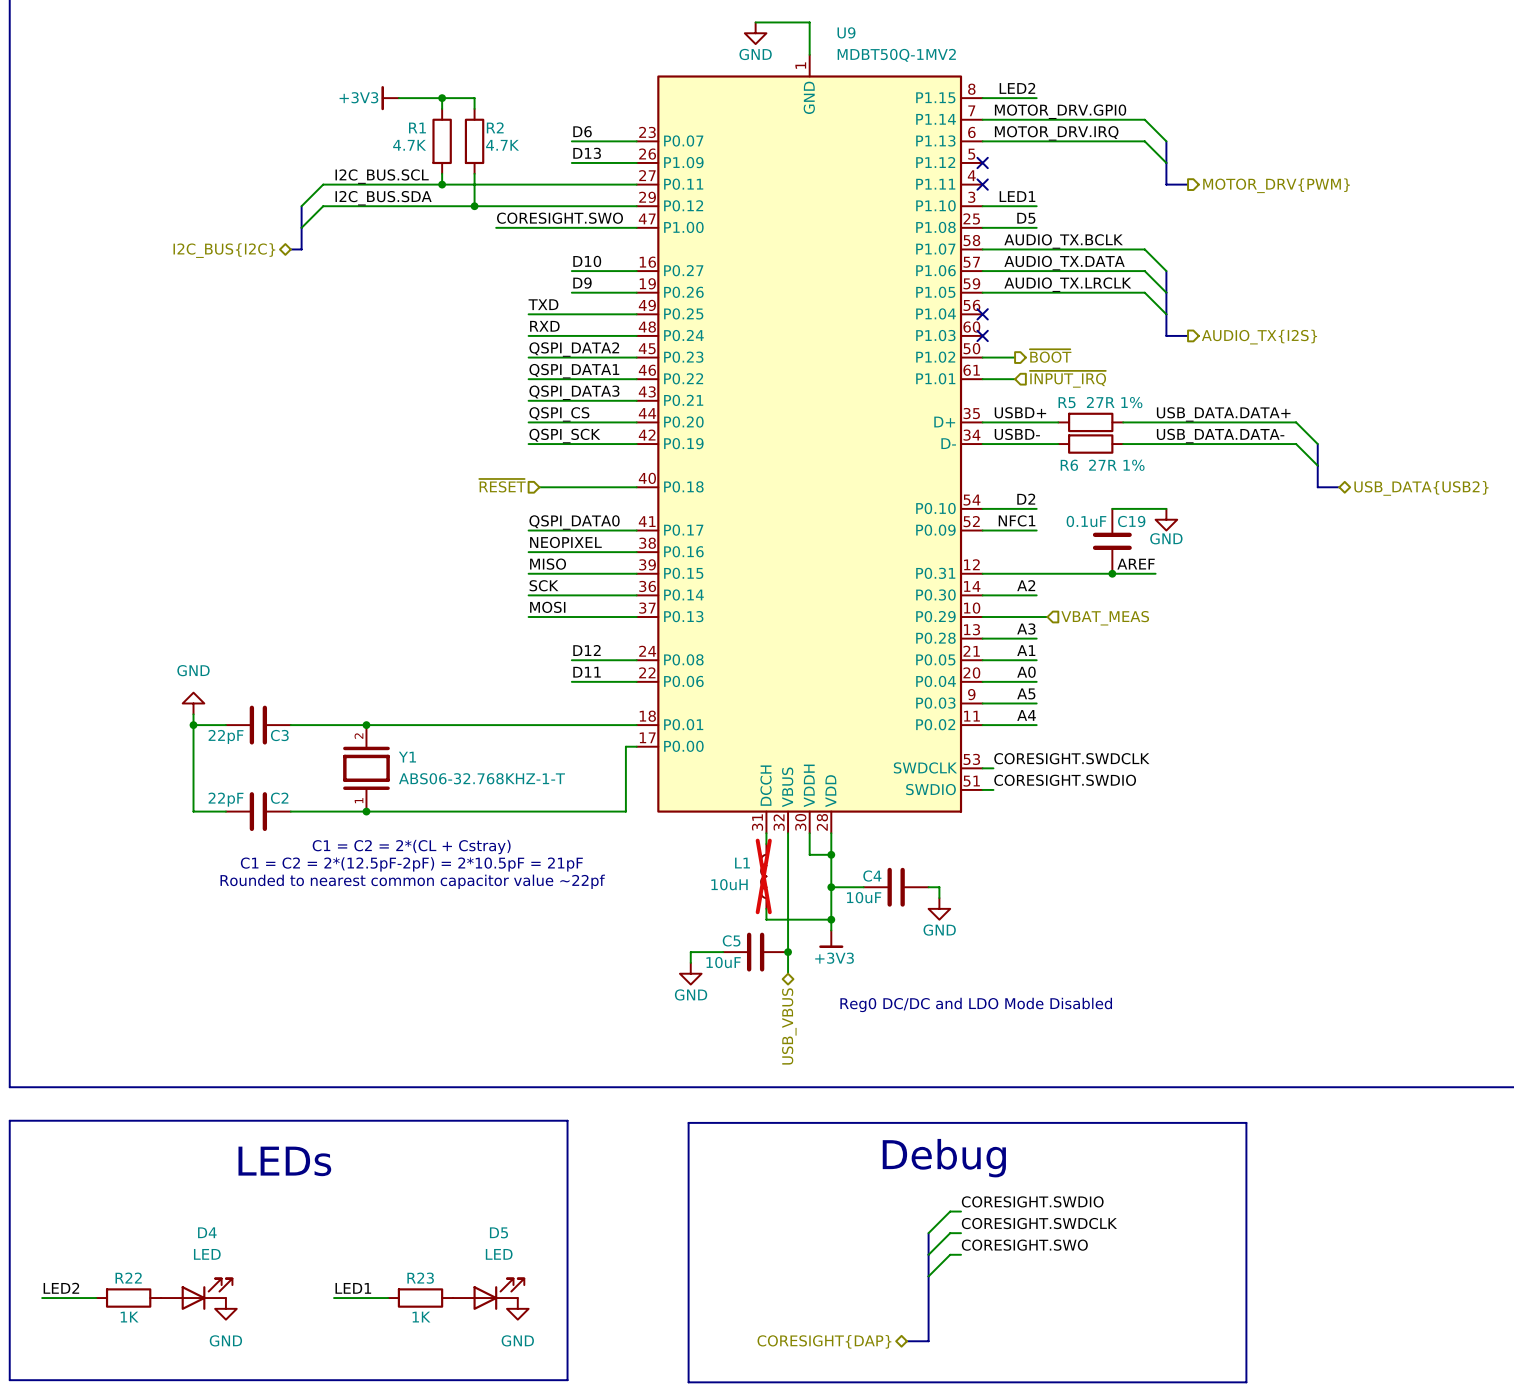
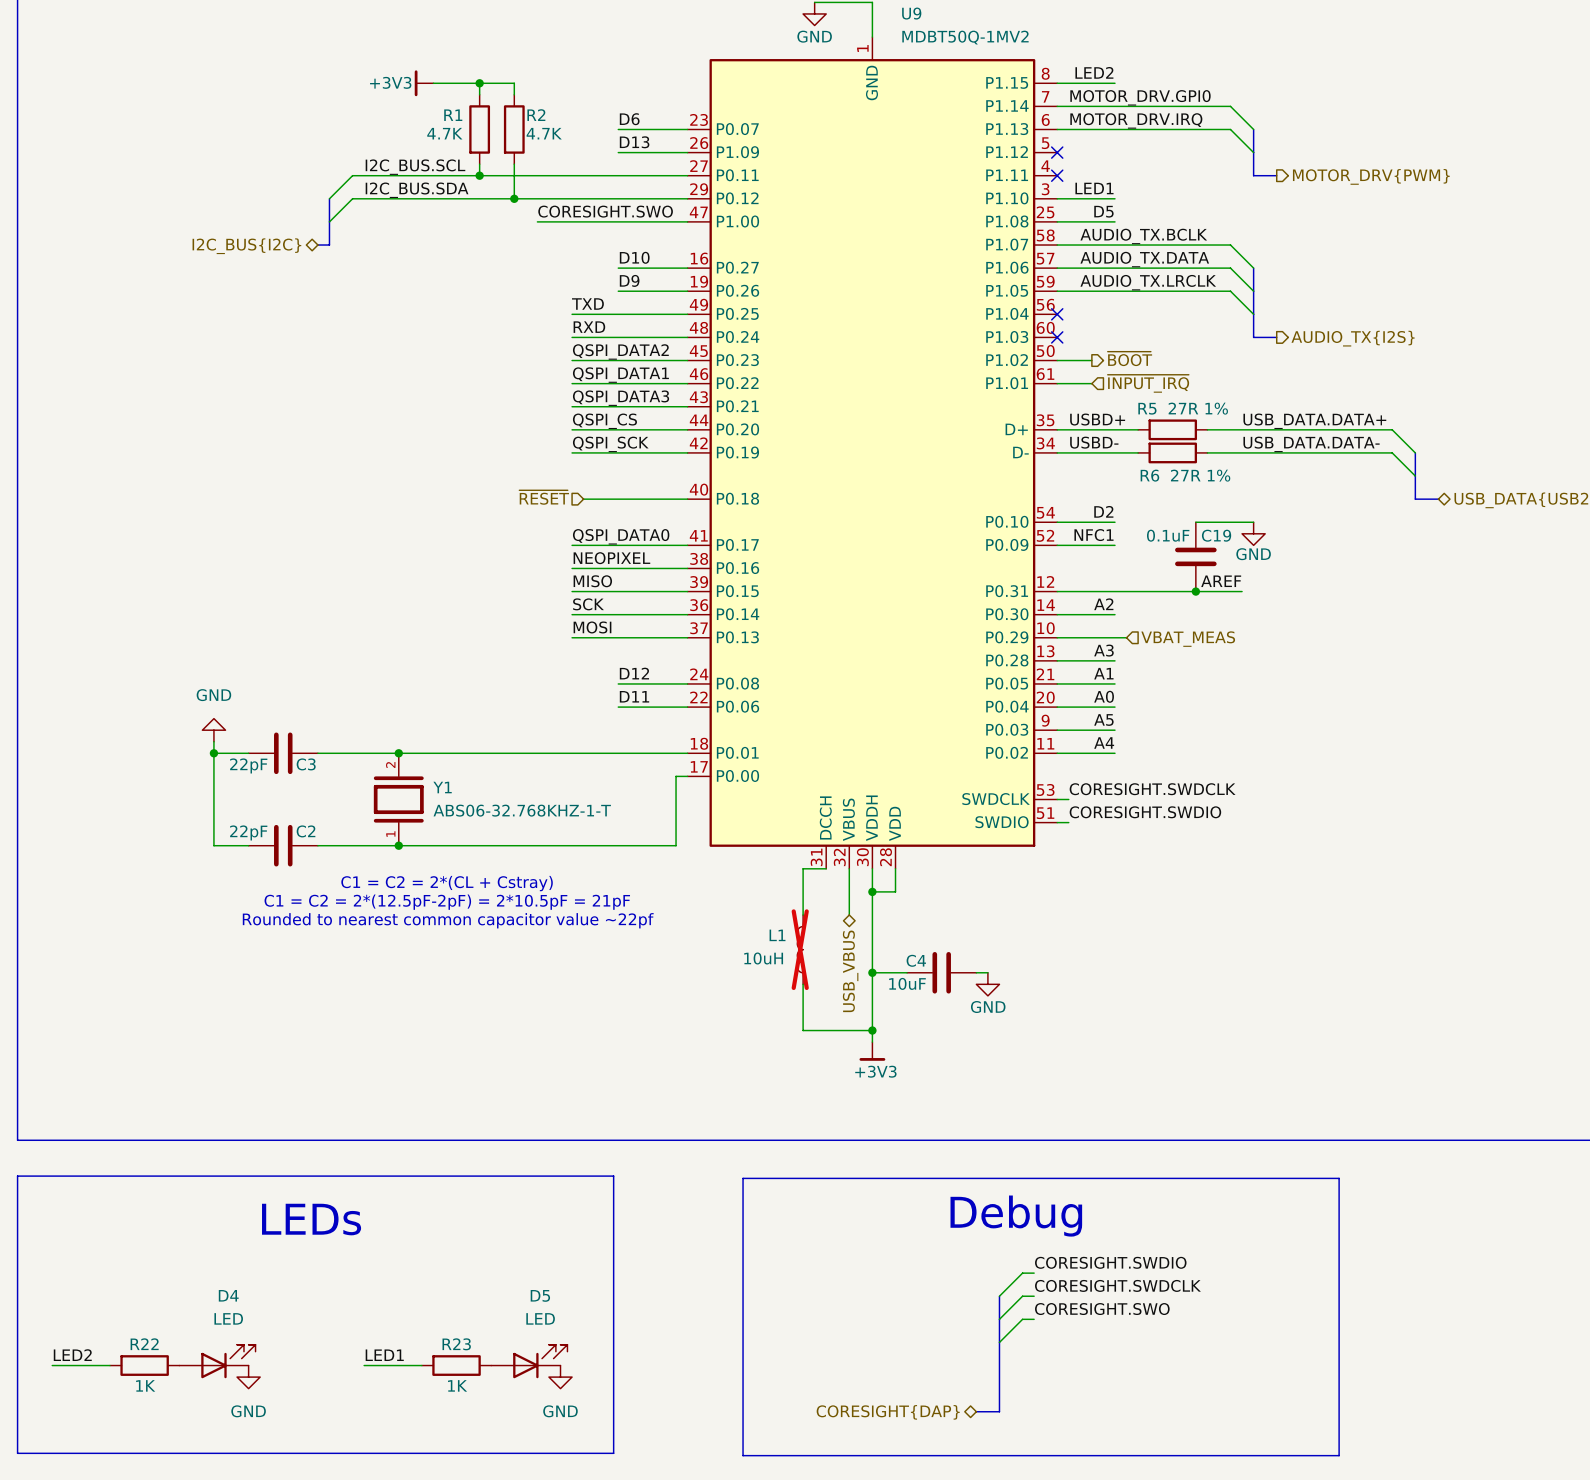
wire: (766, 833) (766, 844) -> (826, 868) (803, 868) (803, 915)
wire: none -> (872, 891) (872, 1042)
junction: none -> (872, 891)
wire: (831, 854) (831, 930) -> none
junction: (831, 854) -> none
L1 position: (763, 876) -> (800, 949)
wire: (788, 876) (788, 973) -> none
wire: (831, 887) (863, 887) -> (872, 972) (907, 972)
junction: (831, 887) -> none
C4 position: (896, 887) -> (941, 972)
wire: (928, 887) (939, 887) (939, 898) -> none
wire: (766, 908) (766, 919) (831, 919) -> none
power symbol position: GND (939, 908) -> GND (987, 984)
junction: (831, 919) -> none
junction: none -> (872, 972)
wire: none -> (976, 972) (987, 972)
power symbol position: +3V3 (831, 939) -> +3V3 (872, 1051)
wire: none -> (803, 984) (803, 1030) (872, 1030)
wire: (723, 952) (690, 952) (690, 962) -> none
C5: 10uF (755, 952) -> none
junction: (788, 952) -> none
power symbol: GND (690, 973) -> none
junction: none -> (872, 1030)
text: Reg0 DC/DC and LDO Mode Disabled (976, 1004) -> none
hierarchical label position: USB_VBUS (789, 1026) -> USB_VBUS (850, 971)

